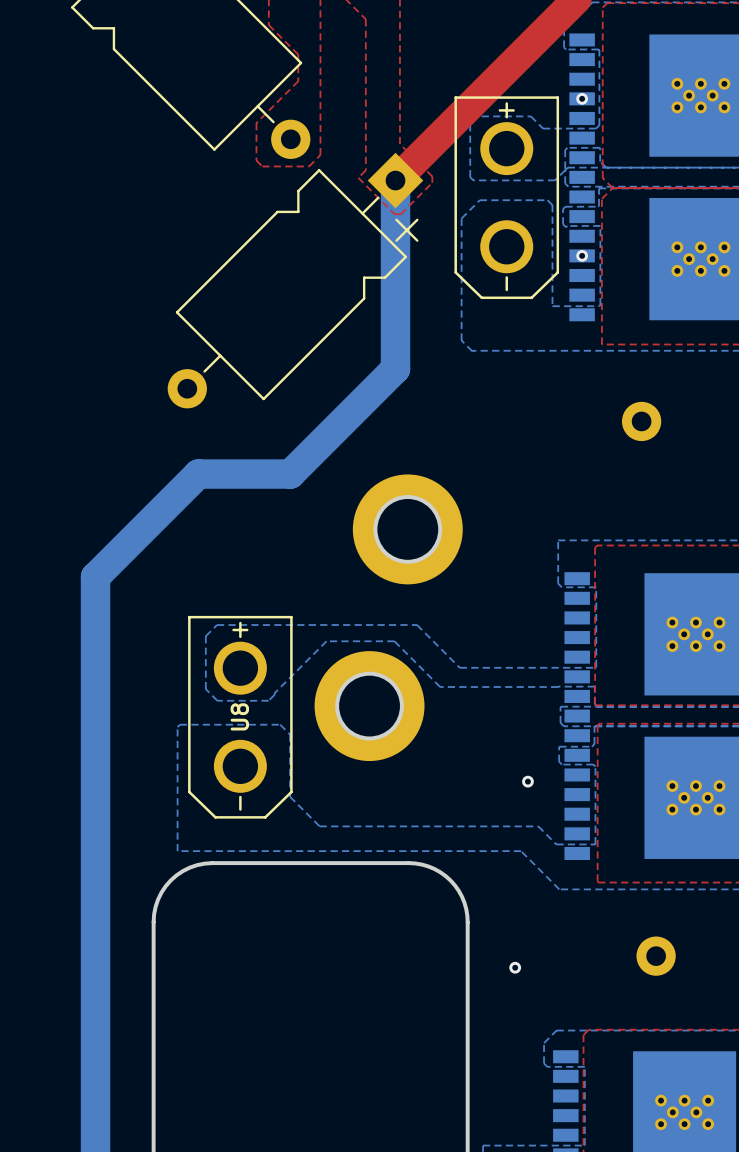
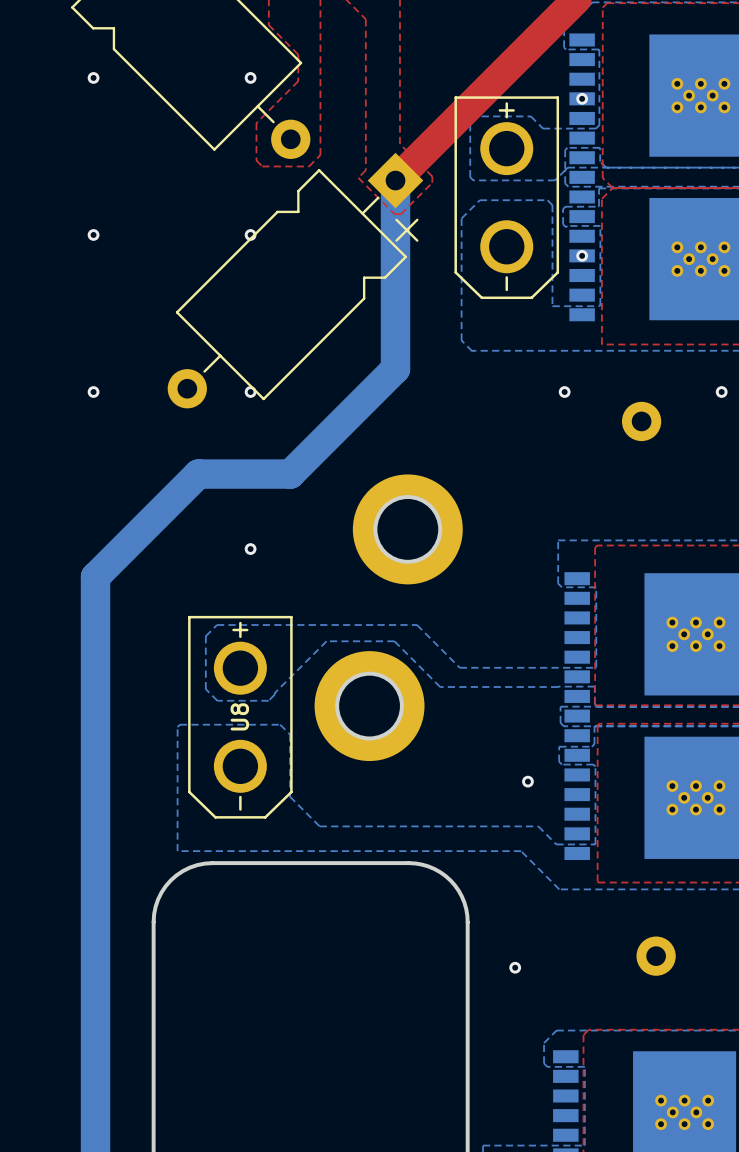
via: none -> (93, 77)
via: none -> (250, 77)
via: none -> (93, 234)
via: none -> (250, 234)
via: none -> (93, 392)
via: none -> (250, 392)
via: none -> (564, 392)
via: none -> (721, 392)
via: none -> (250, 549)

